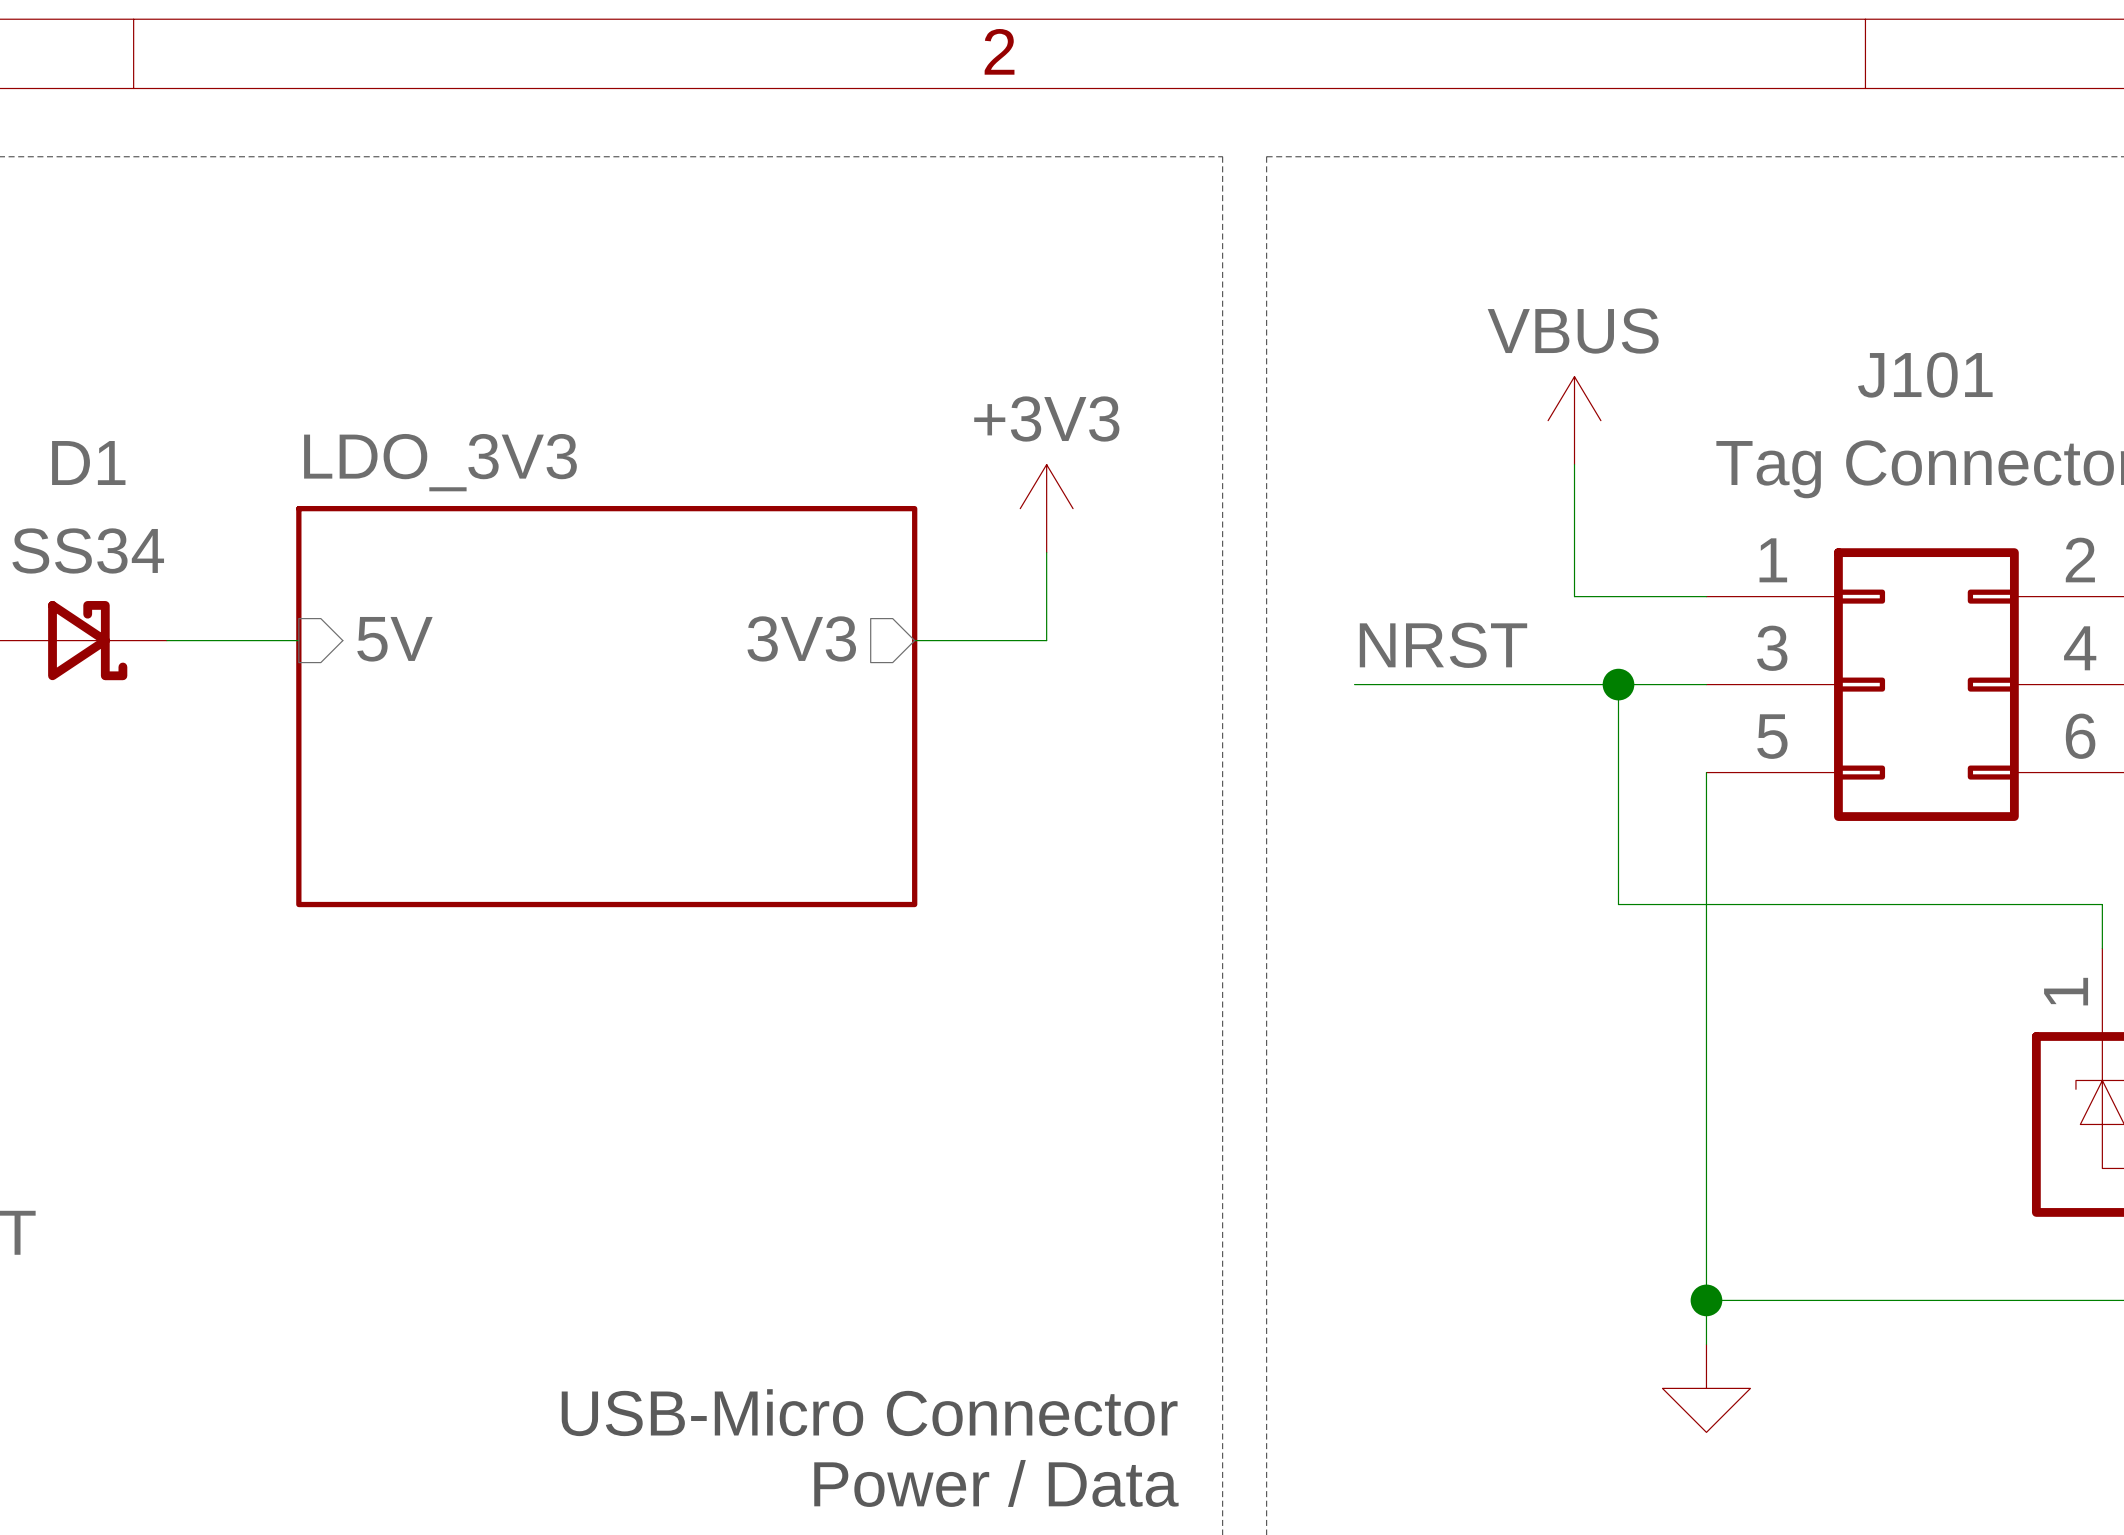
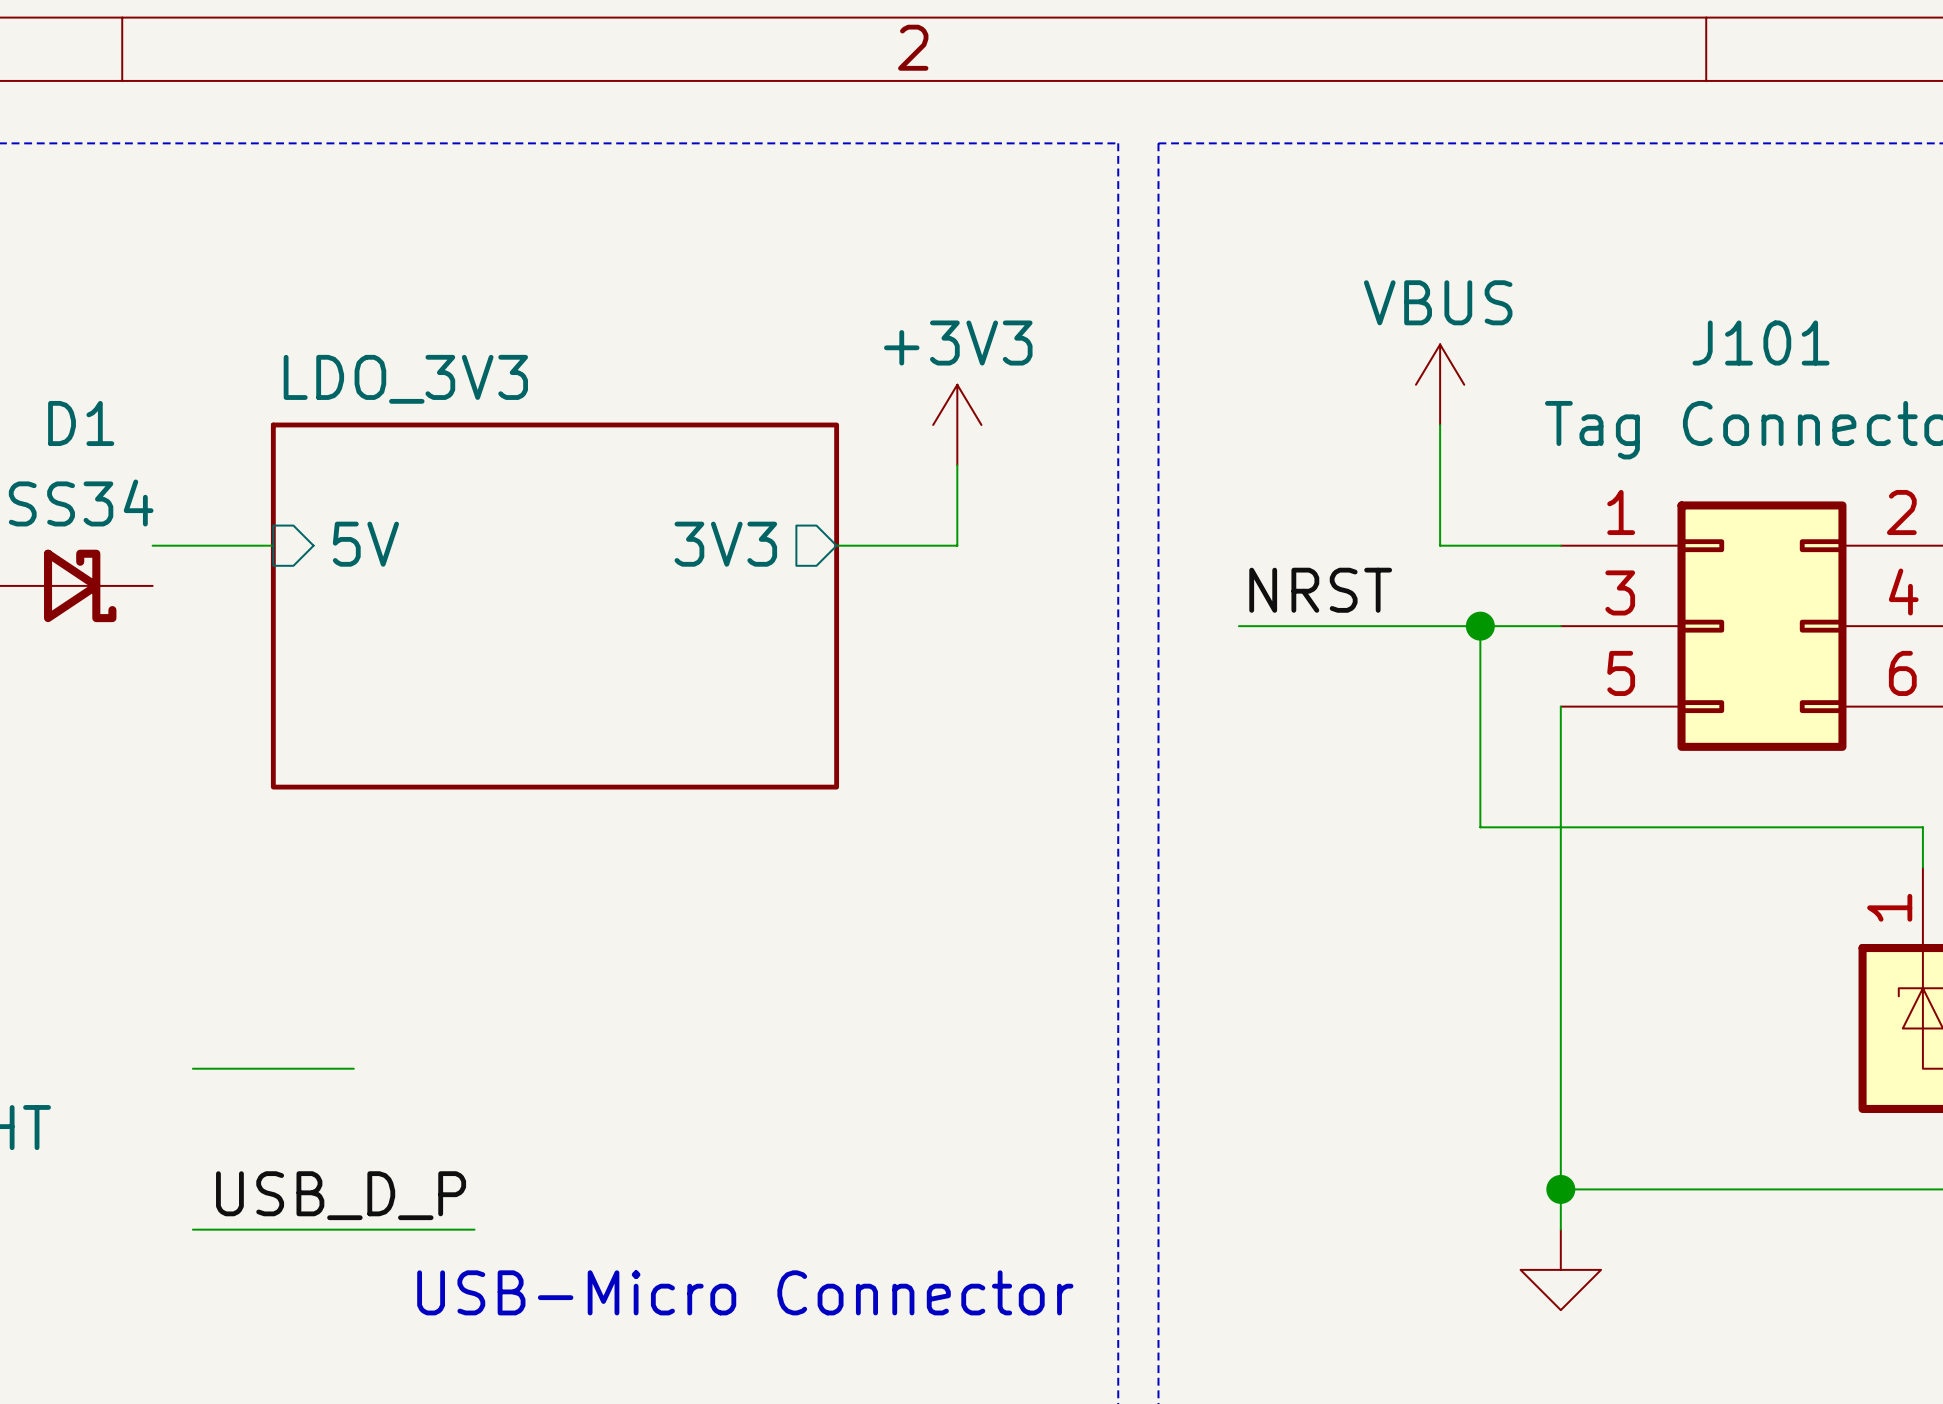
power symbol position: +3V3 (1046, 508) -> +3V3 (957, 424)
wire: (1046, 596) (1046, 640) (914, 640) -> (957, 545) (836, 545)
sheet pin position: 3V3 (801, 638) -> 3V3 (725, 544)
sheet pin position: 5V (394, 639) -> 5V (365, 544)
wire: (166, 640) (298, 640) -> (152, 545) (273, 545)
sheet LDO_3V3 position: (606, 706) -> (554, 606)
wire: none -> (192, 1068) (353, 1068)
label: none -> USB_D_P (341, 1195)
wire: none -> (192, 1229) (474, 1229)
text: Power / Data (996, 1483) -> none

